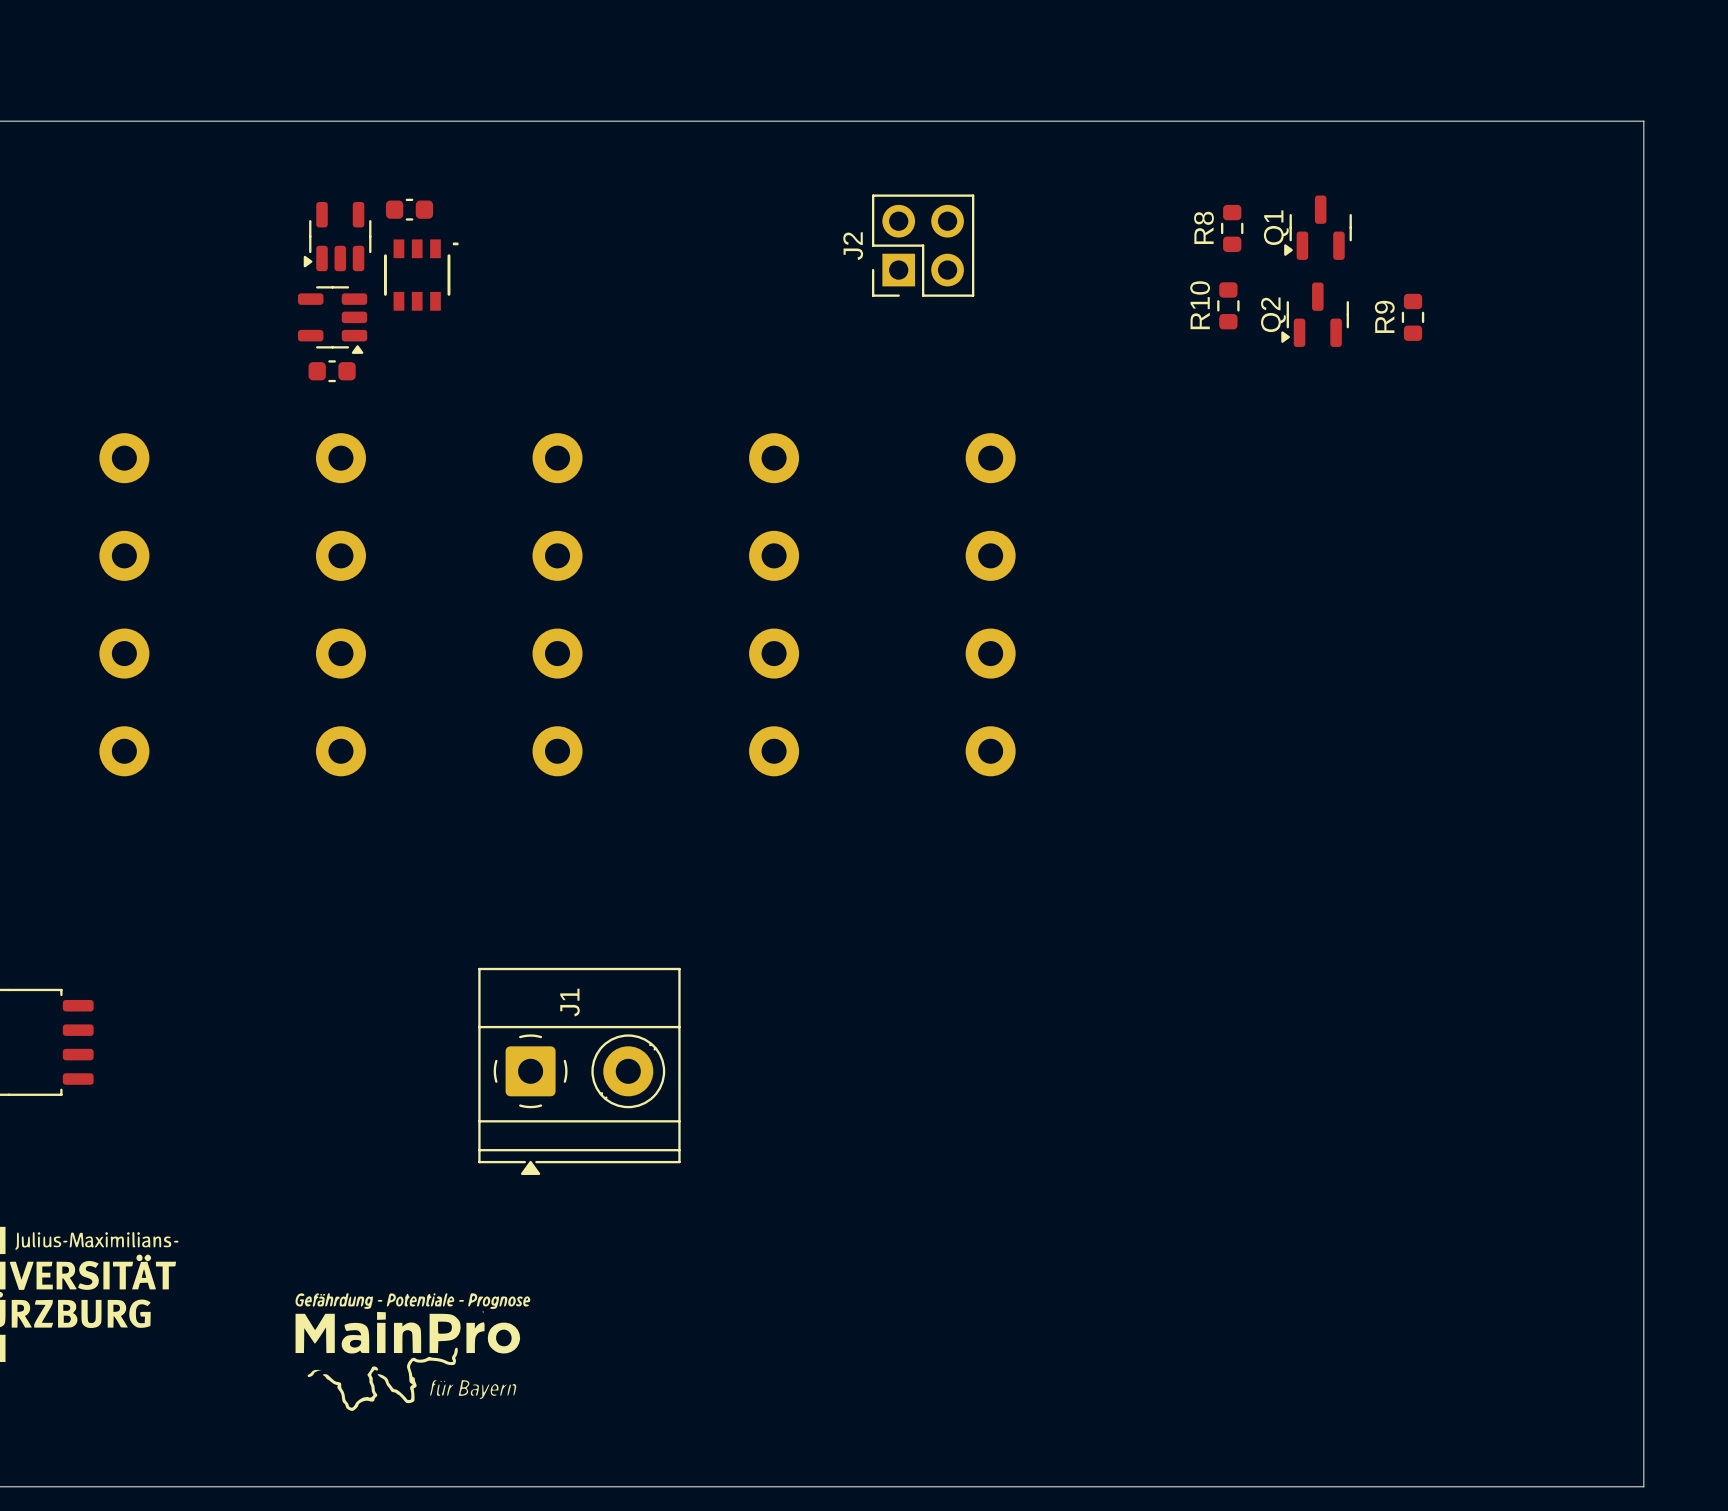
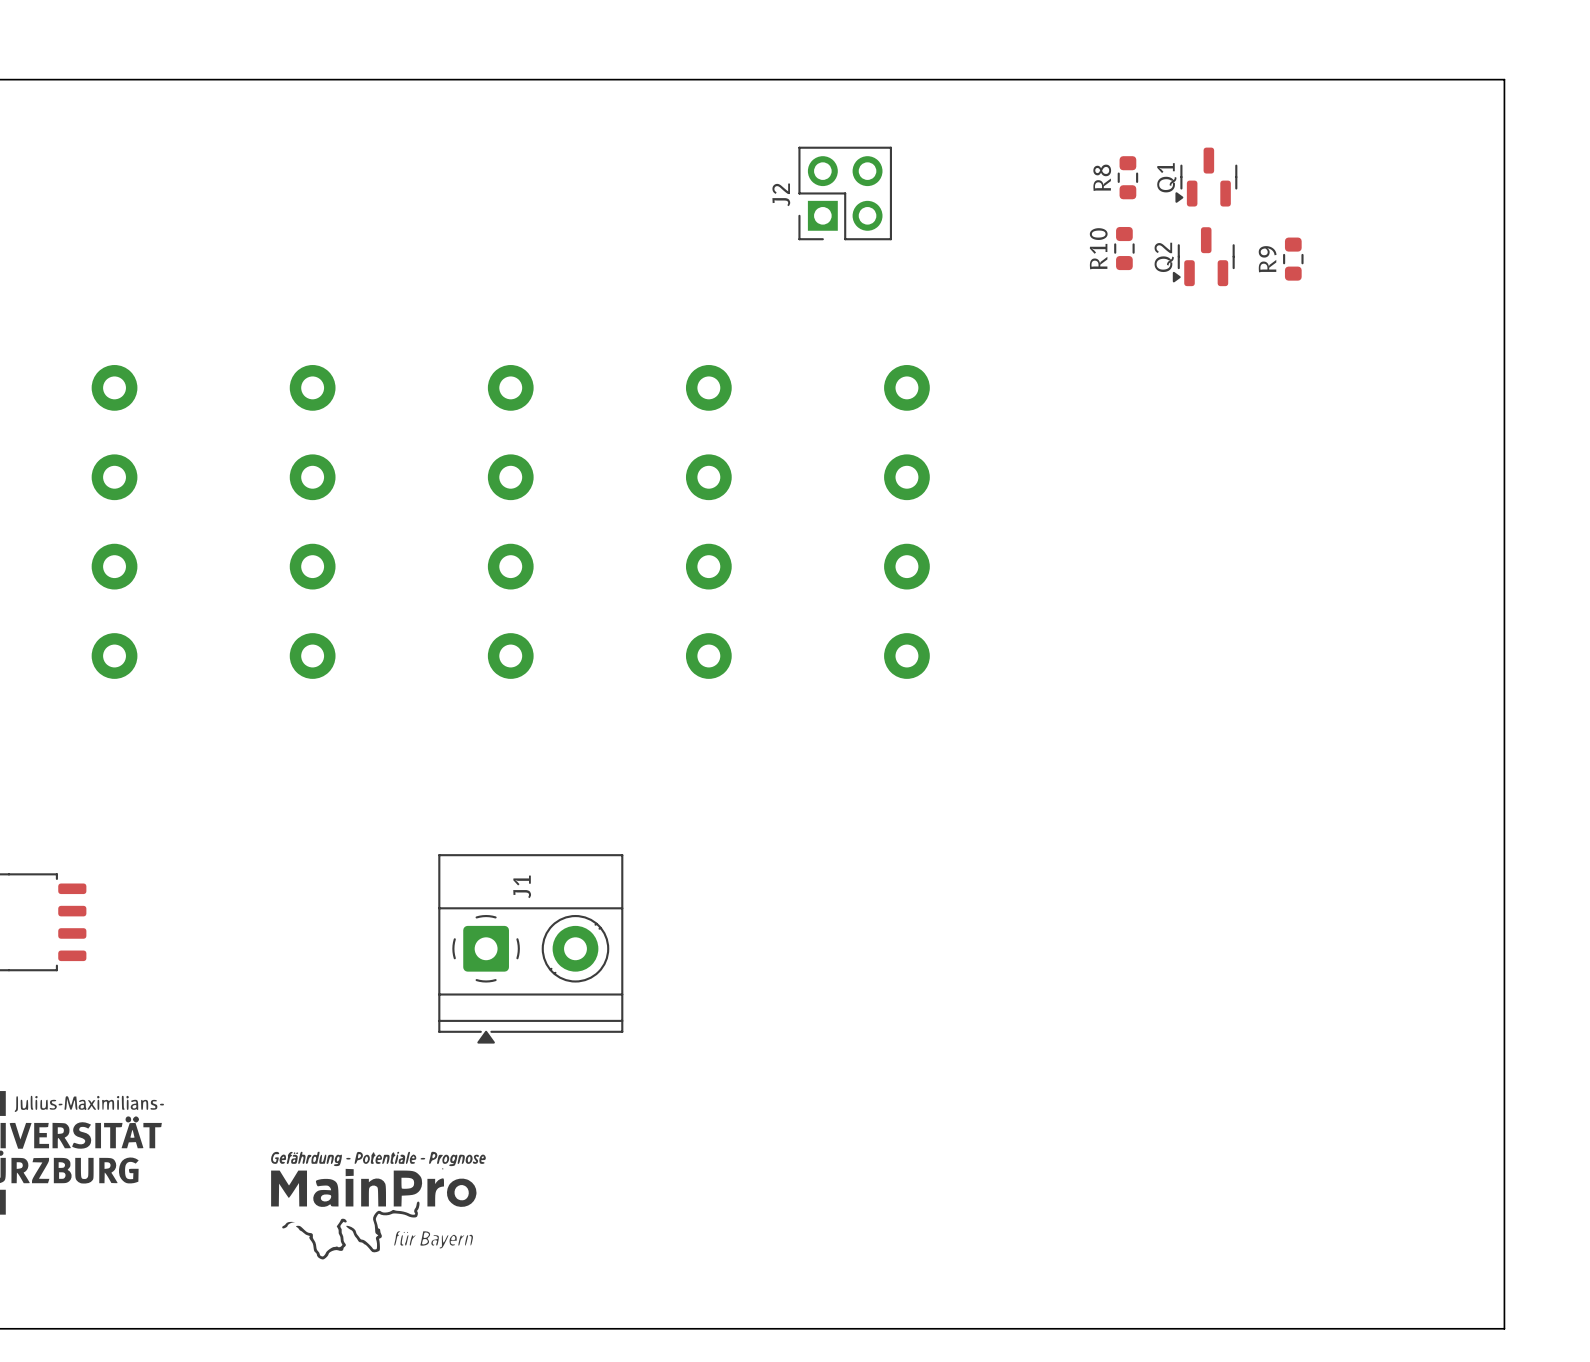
part: (409, 209) -> none
part: (337, 236) -> none
part: (417, 275) -> none
part: (332, 320) -> none
part: (332, 371) -> none

